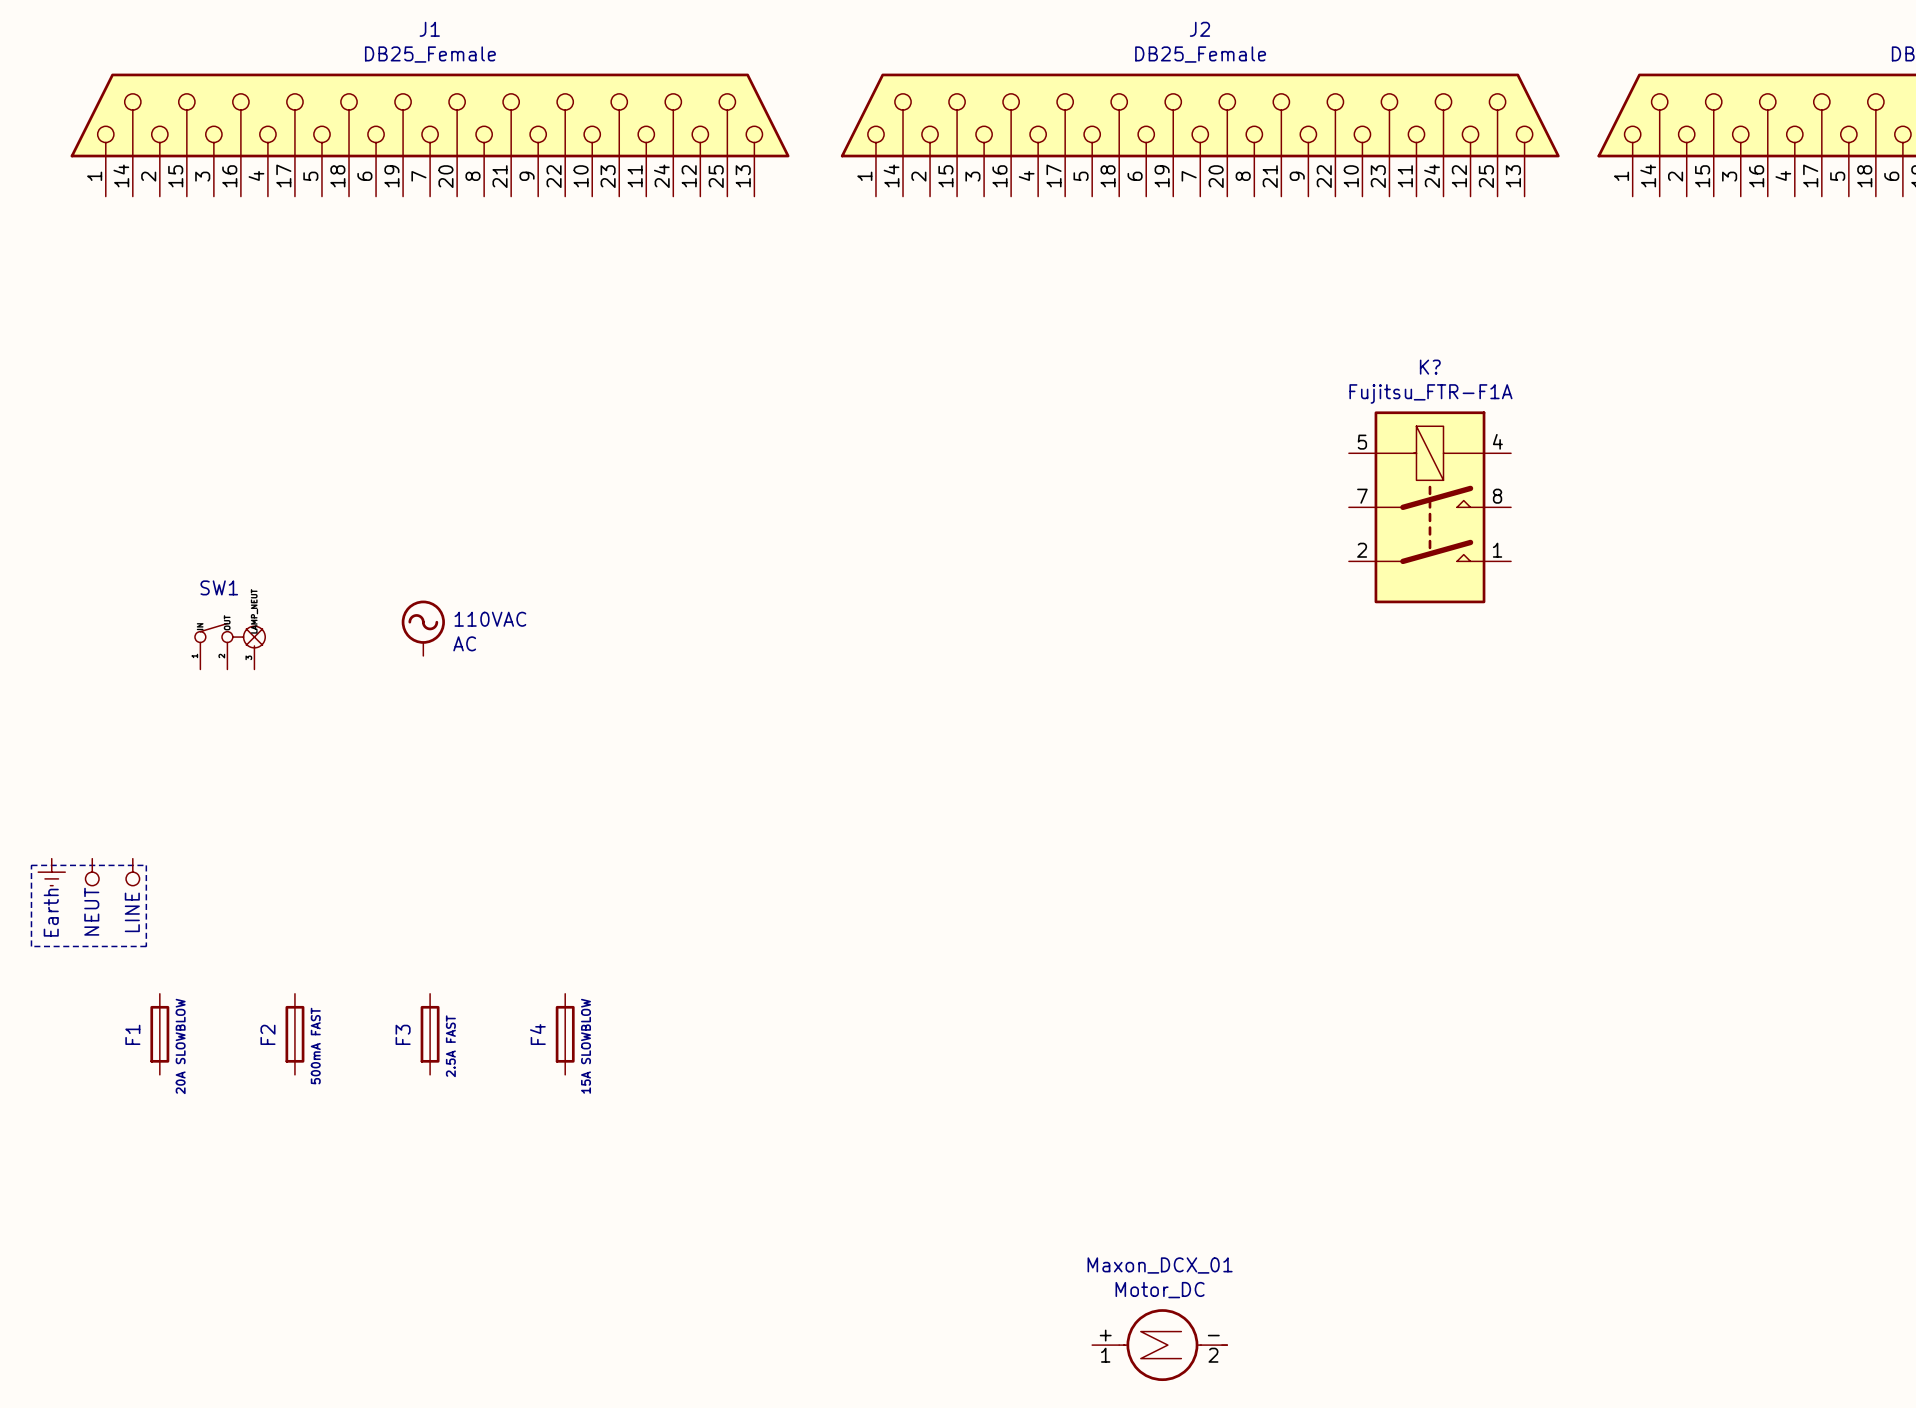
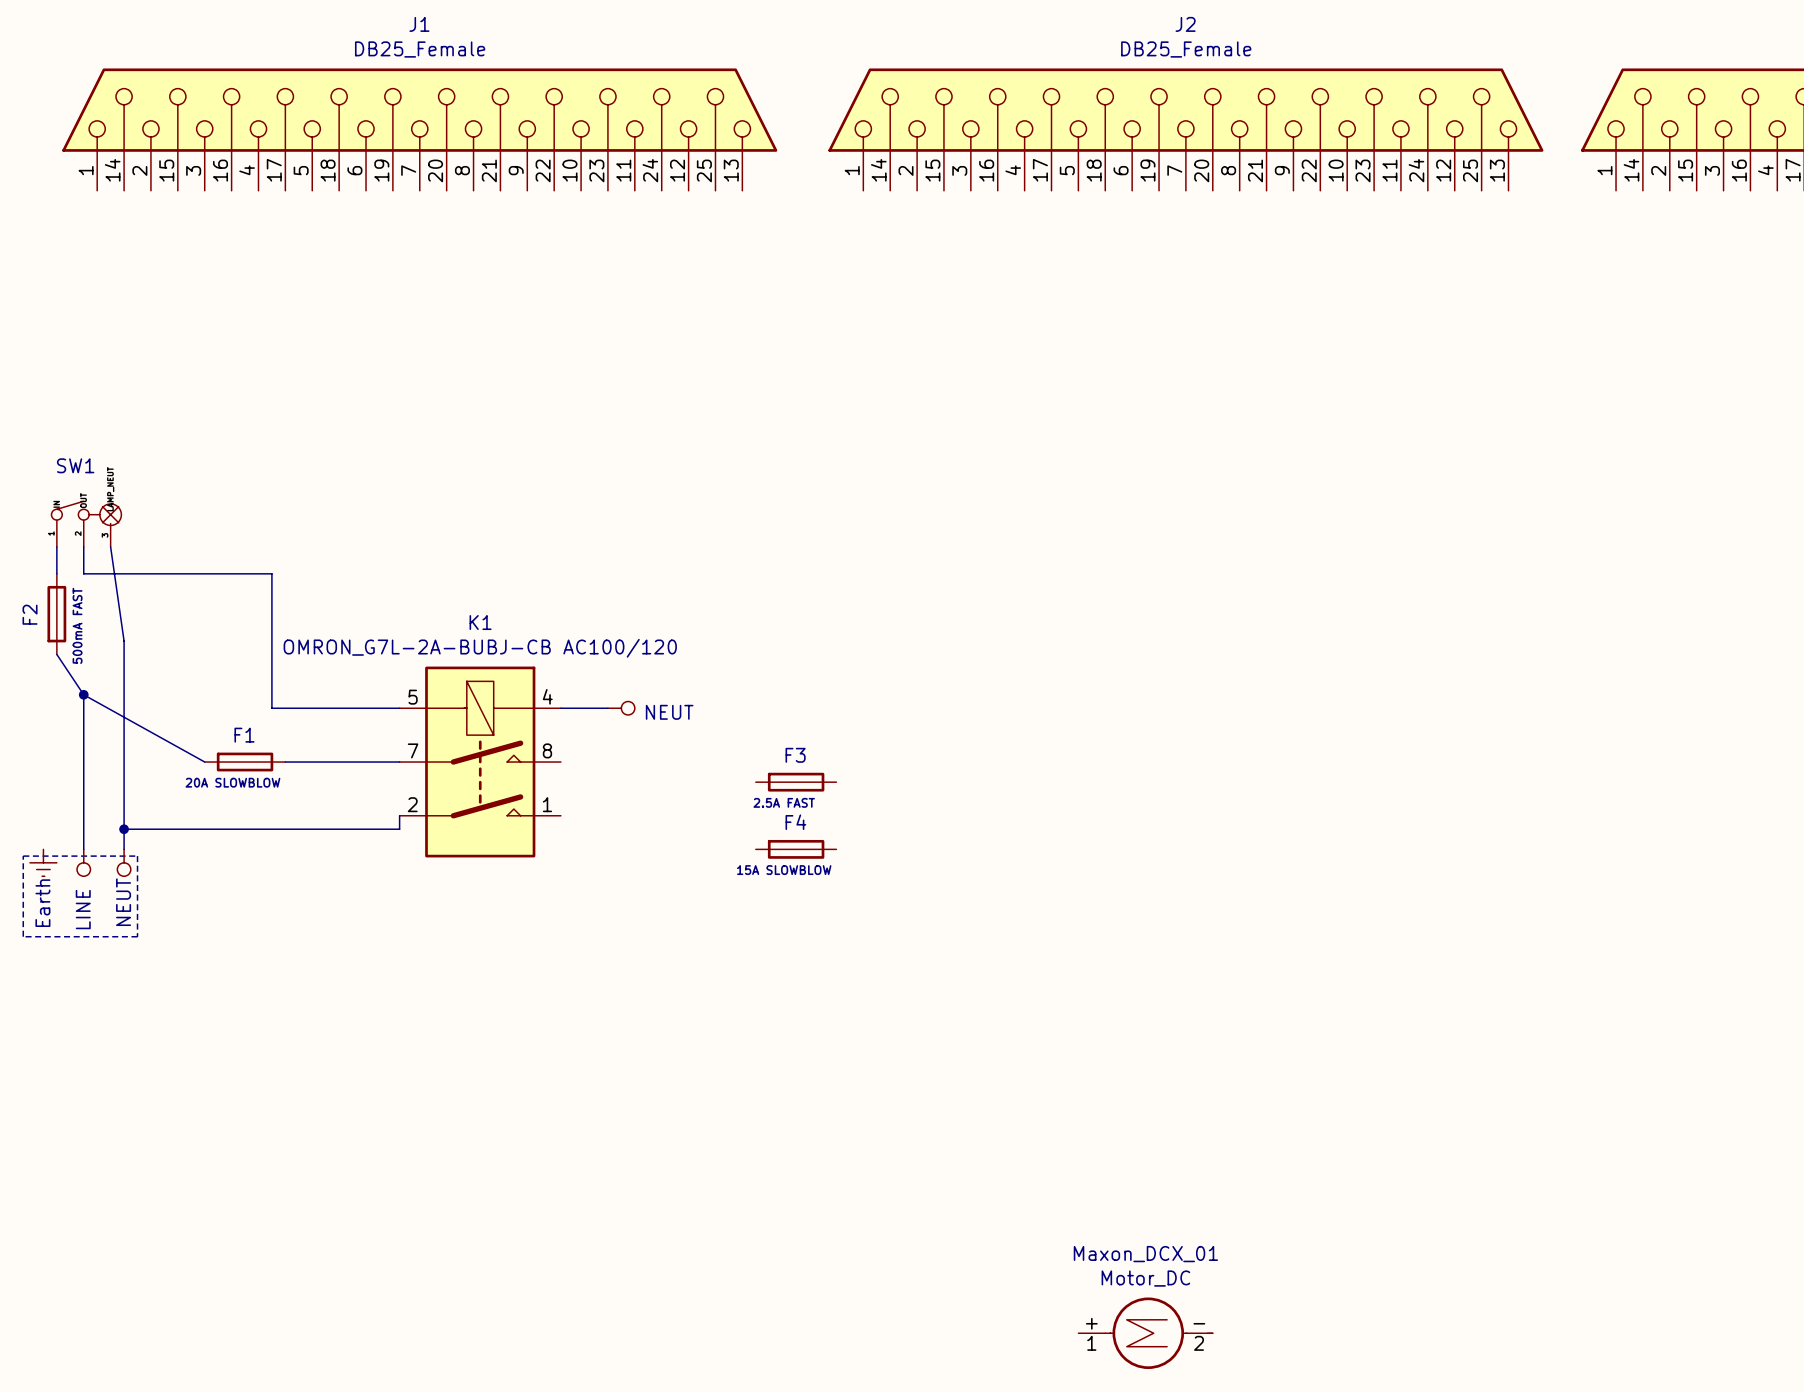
K?: Fujitsu_FTR-F1A (1429, 507) -> none
wire: none -> (56, 546) (56, 573)
wire: none -> (83, 546) (83, 573) (271, 573) (271, 708) (399, 708)
wire: none -> (110, 546) (124, 641) (124, 849)
110VAC: AC (423, 628) -> none
SW1 position: (230, 646) -> (86, 524)
wire: none -> (56, 654) (83, 694)
wire: none -> (83, 694) (204, 762)
wire: none -> (83, 694) (83, 849)
junction: none -> (83, 694)
wire: none -> (560, 708) (607, 708)
power symbol: none -> NEUT (621, 708)
wire: none -> (285, 762) (399, 762)
K1: none -> OMRON_G7L-2A-BUBJ-CB AC100/120 (480, 762)
wire: none -> (399, 815) (399, 829) (124, 829)
junction: none -> (124, 829)
power symbol: NEUT (92, 872) -> LINE (83, 862)
power symbol: LINE (132, 872) -> NEUT (124, 862)
F1 rotation: 0° (159, 1034) -> 90° clockwise (245, 762)
F1 position: (159, 1034) -> (245, 762)
F2 position: (294, 1034) -> (56, 614)
F3 rotation: 0° (430, 1034) -> 90° clockwise (796, 782)
F3 position: (430, 1034) -> (796, 782)
F4 rotation: 0° (565, 1034) -> 90° clockwise (796, 849)
F4 position: (565, 1034) -> (796, 849)

